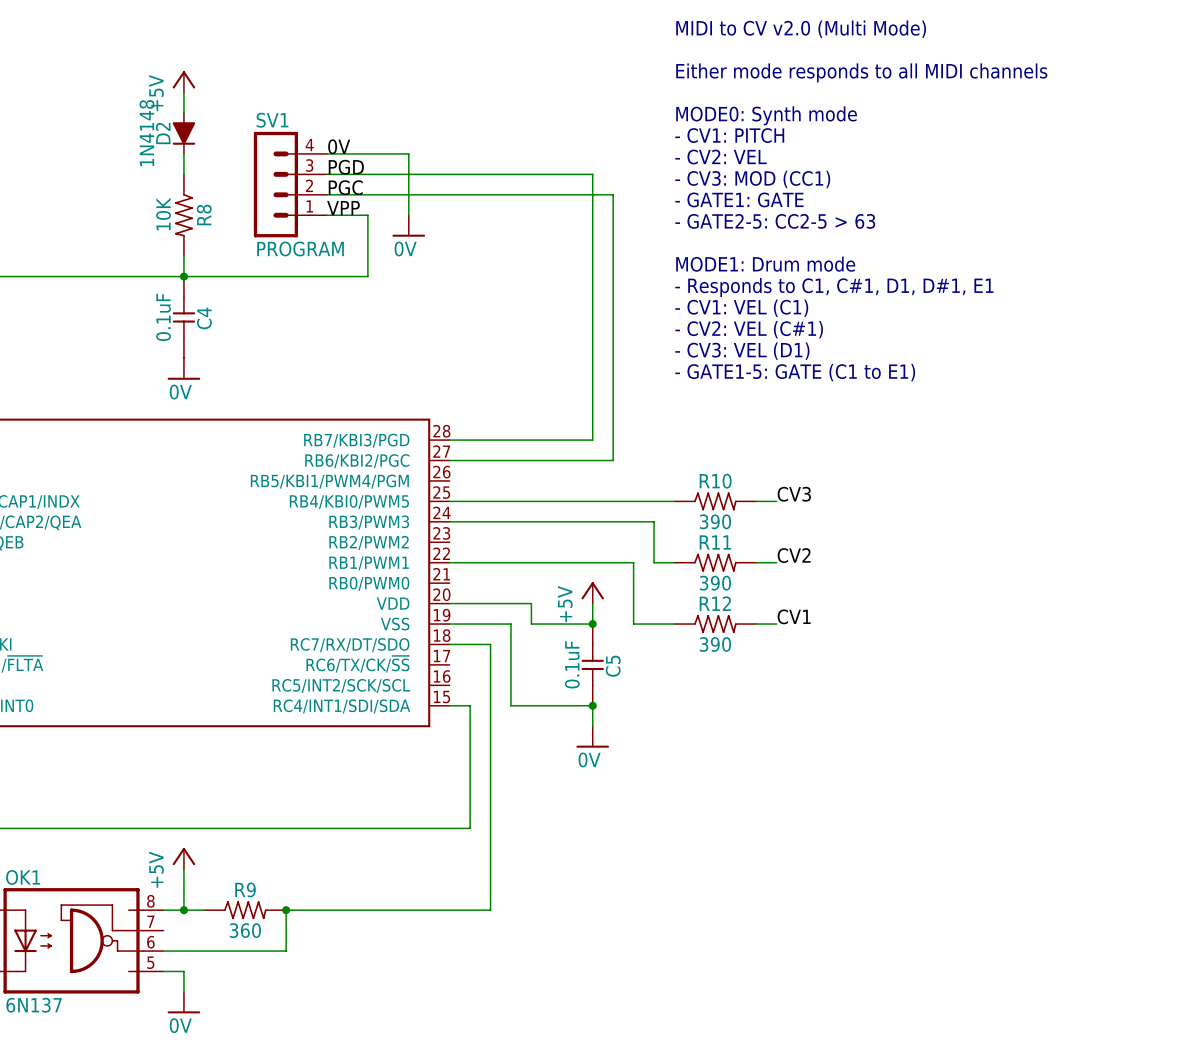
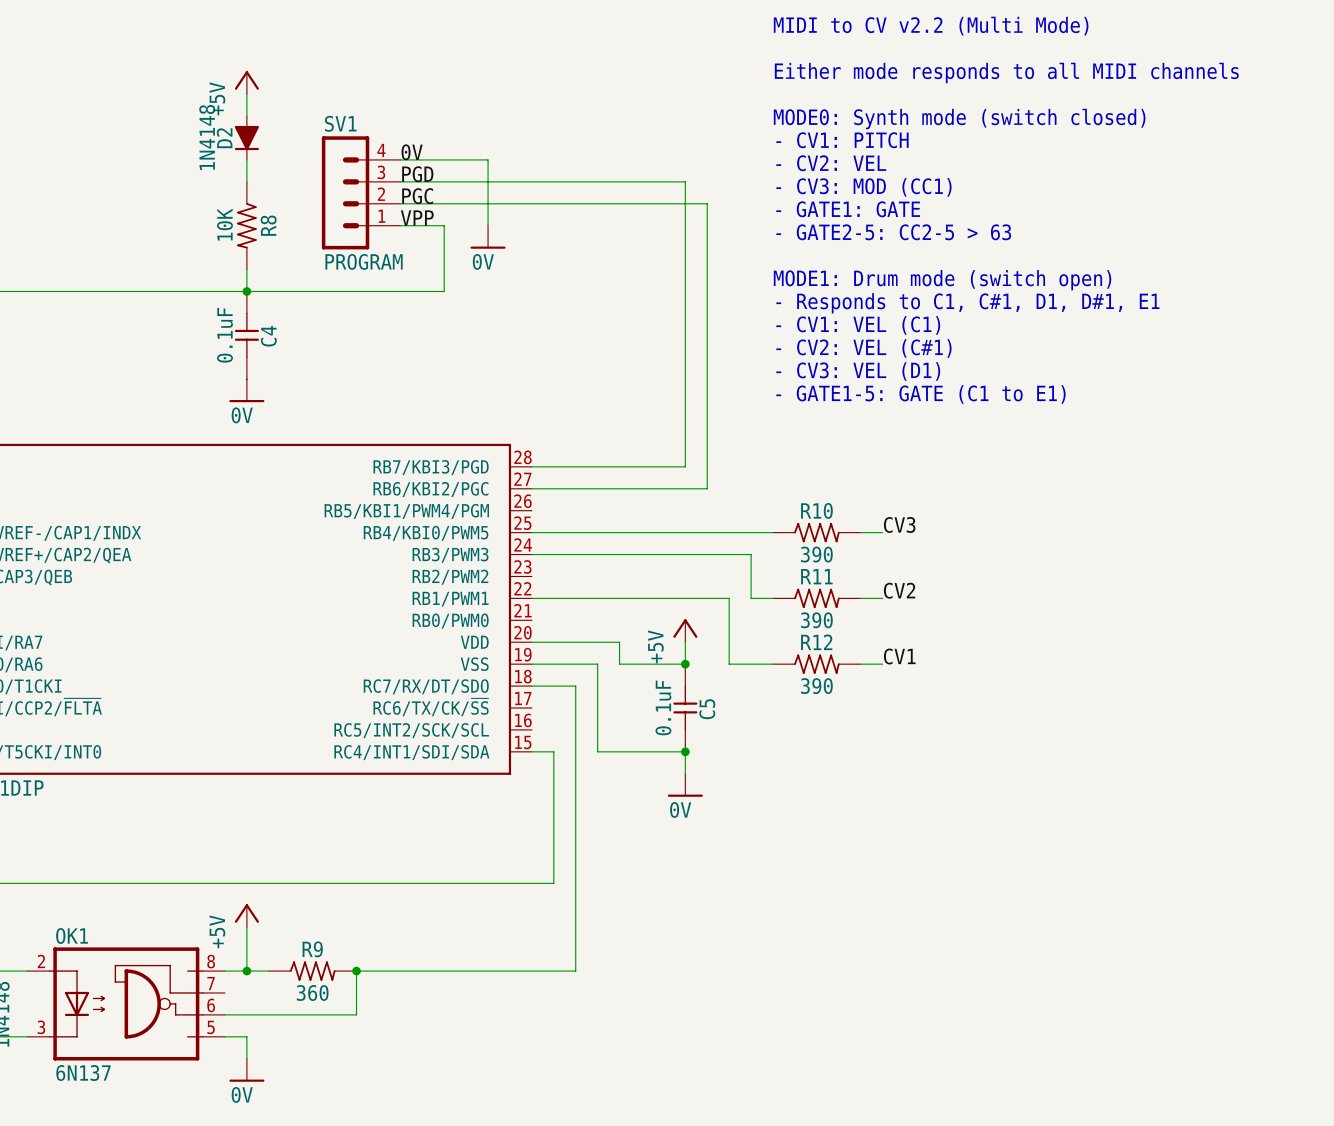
text: MIDI to CV v2.0 (Multi Mode) (801, 29) -> MIDI to CV v2.2 (Multi Mode) (931, 26)
text: MODE0: Synth mode (766, 115) -> MODE0: Synth mode (switch closed) (959, 119)
text: MODE1: Drum mode (765, 264) -> MODE1: Drum mode (switch open) (942, 280)

